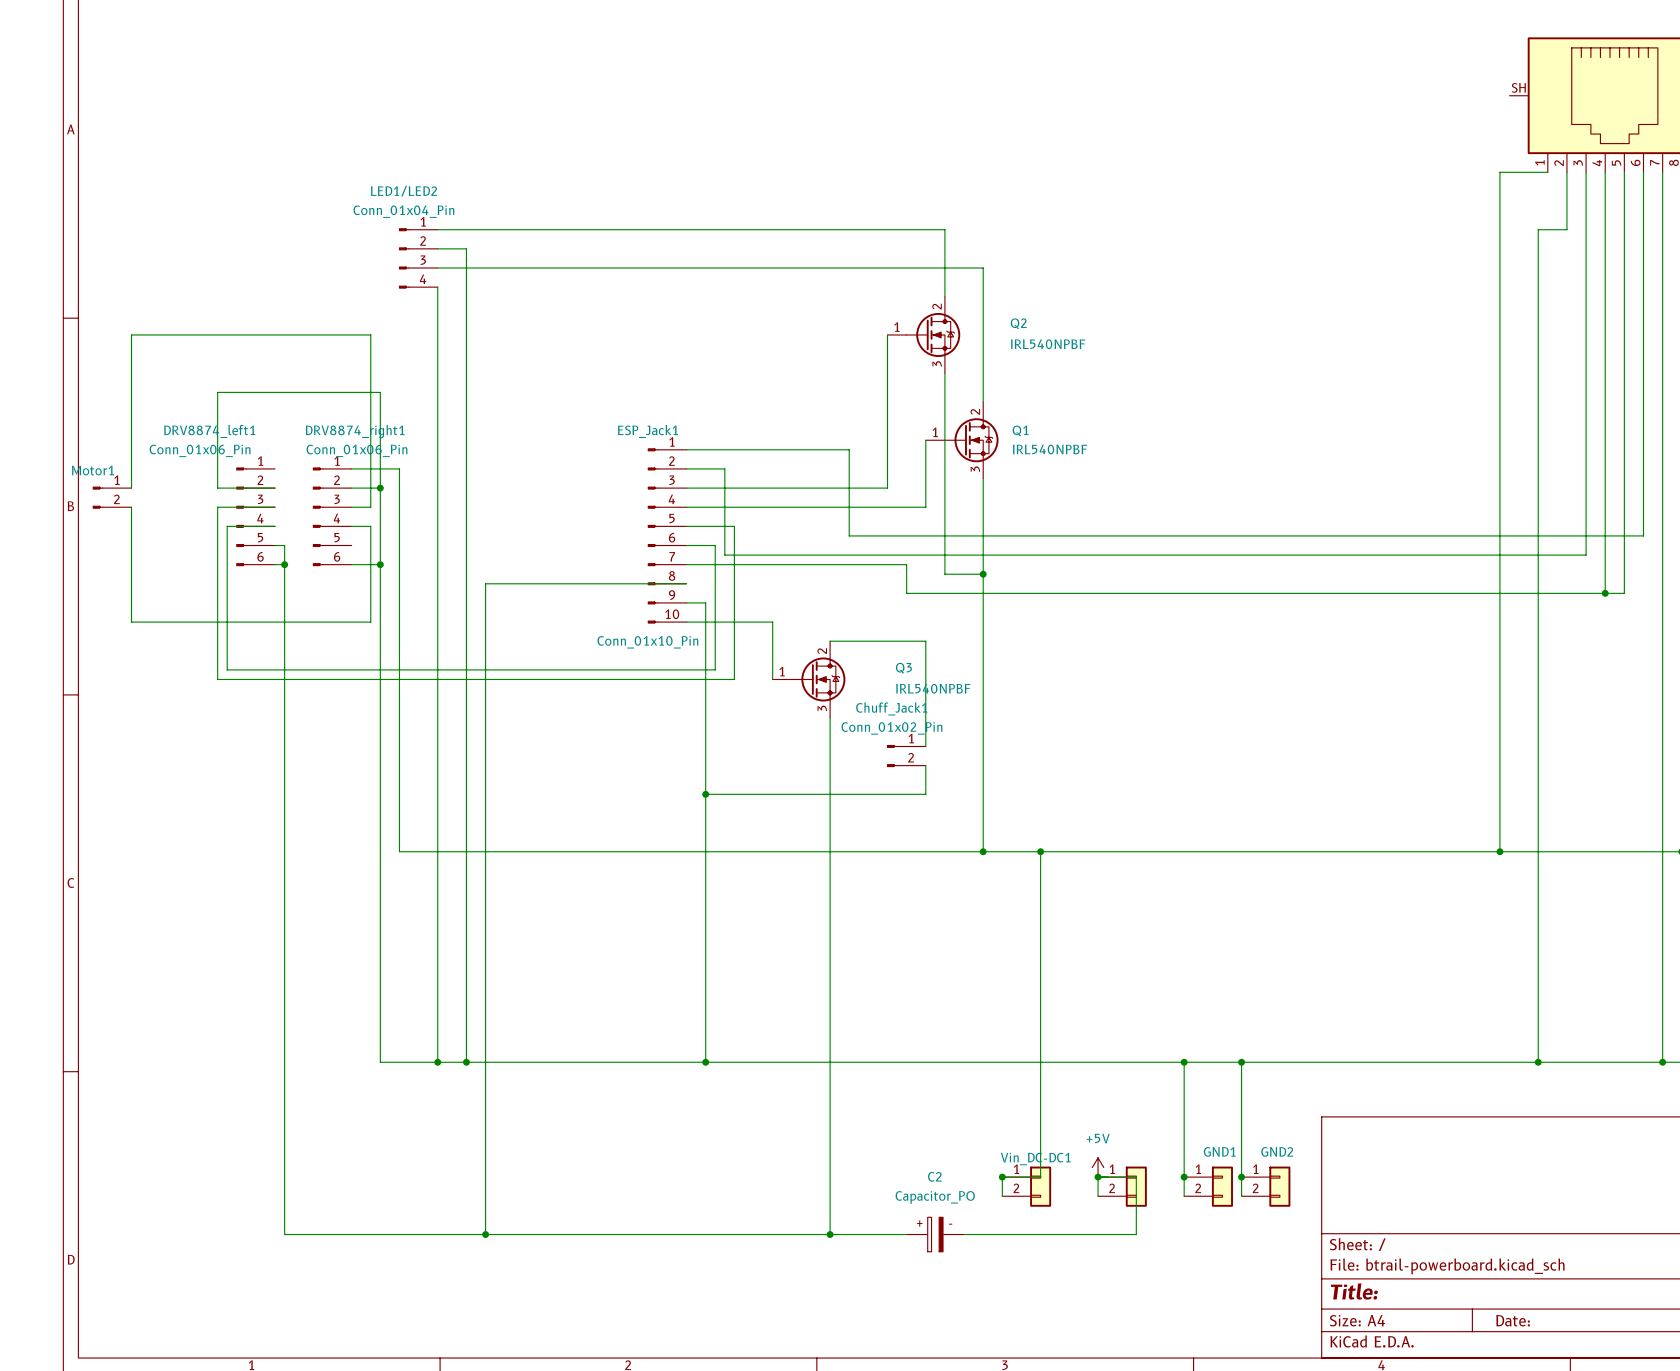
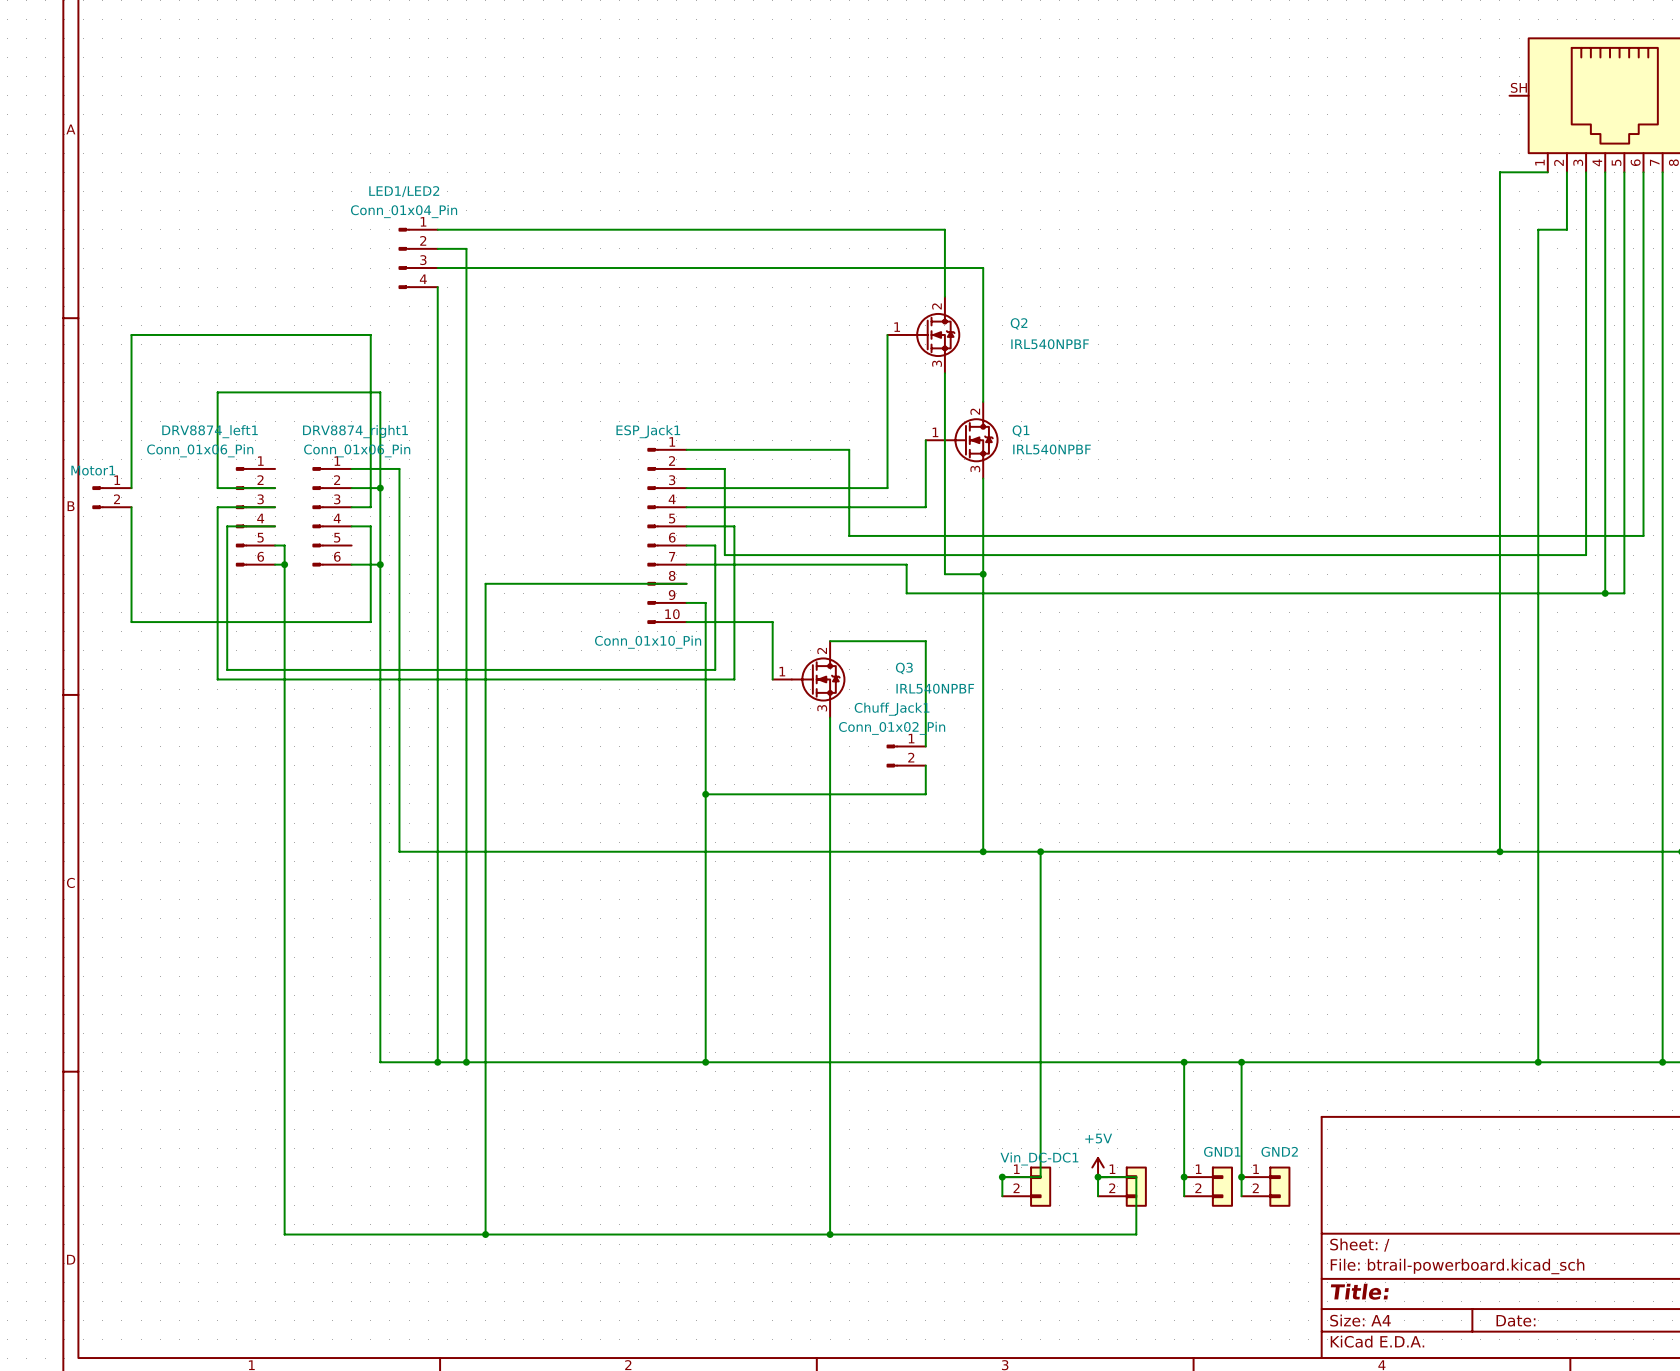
C2: Capacitor_PO (935, 1234) -> none

